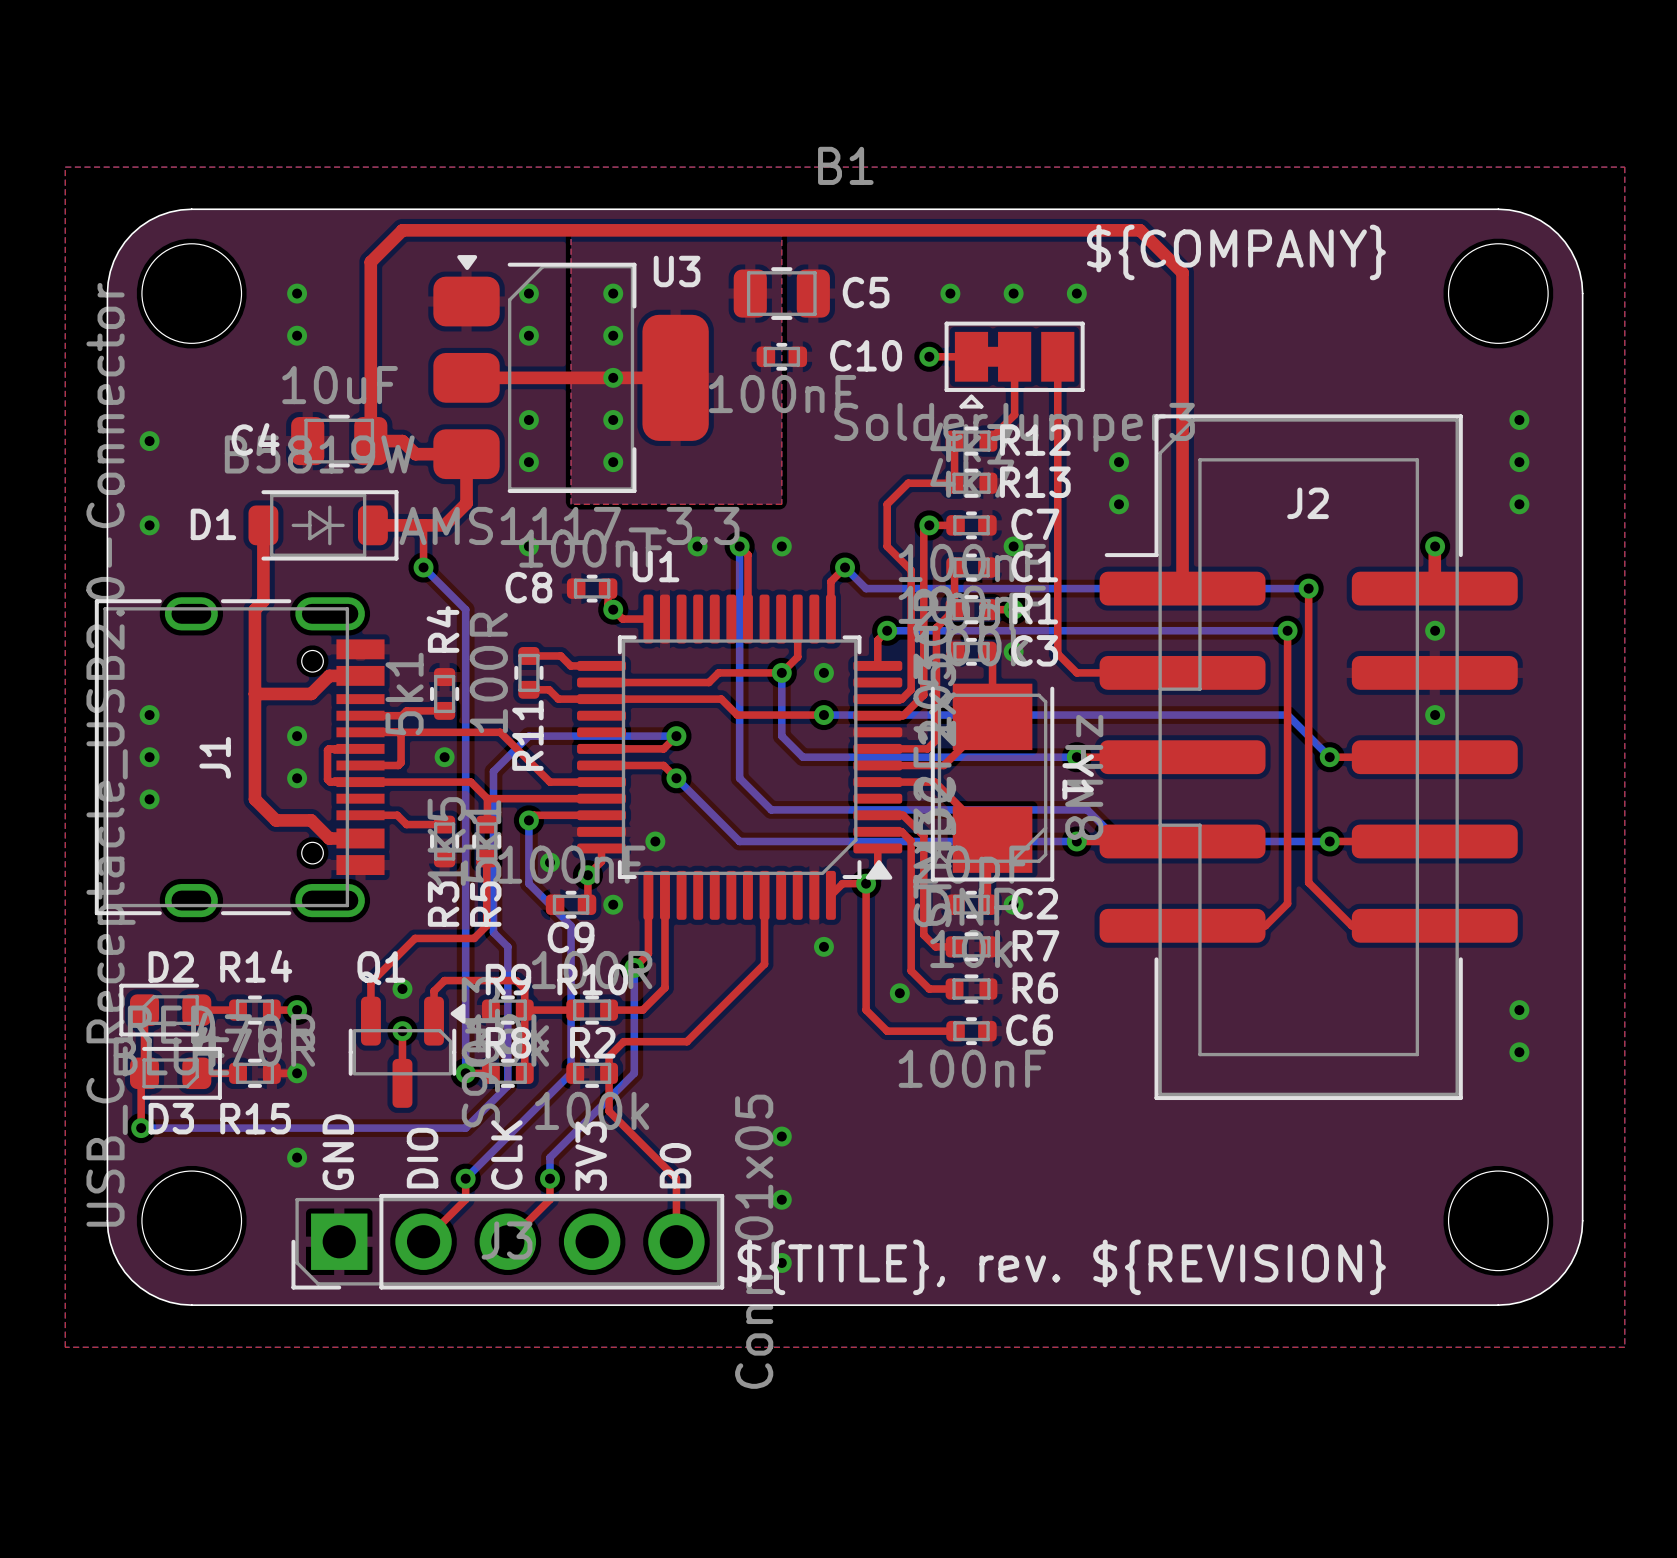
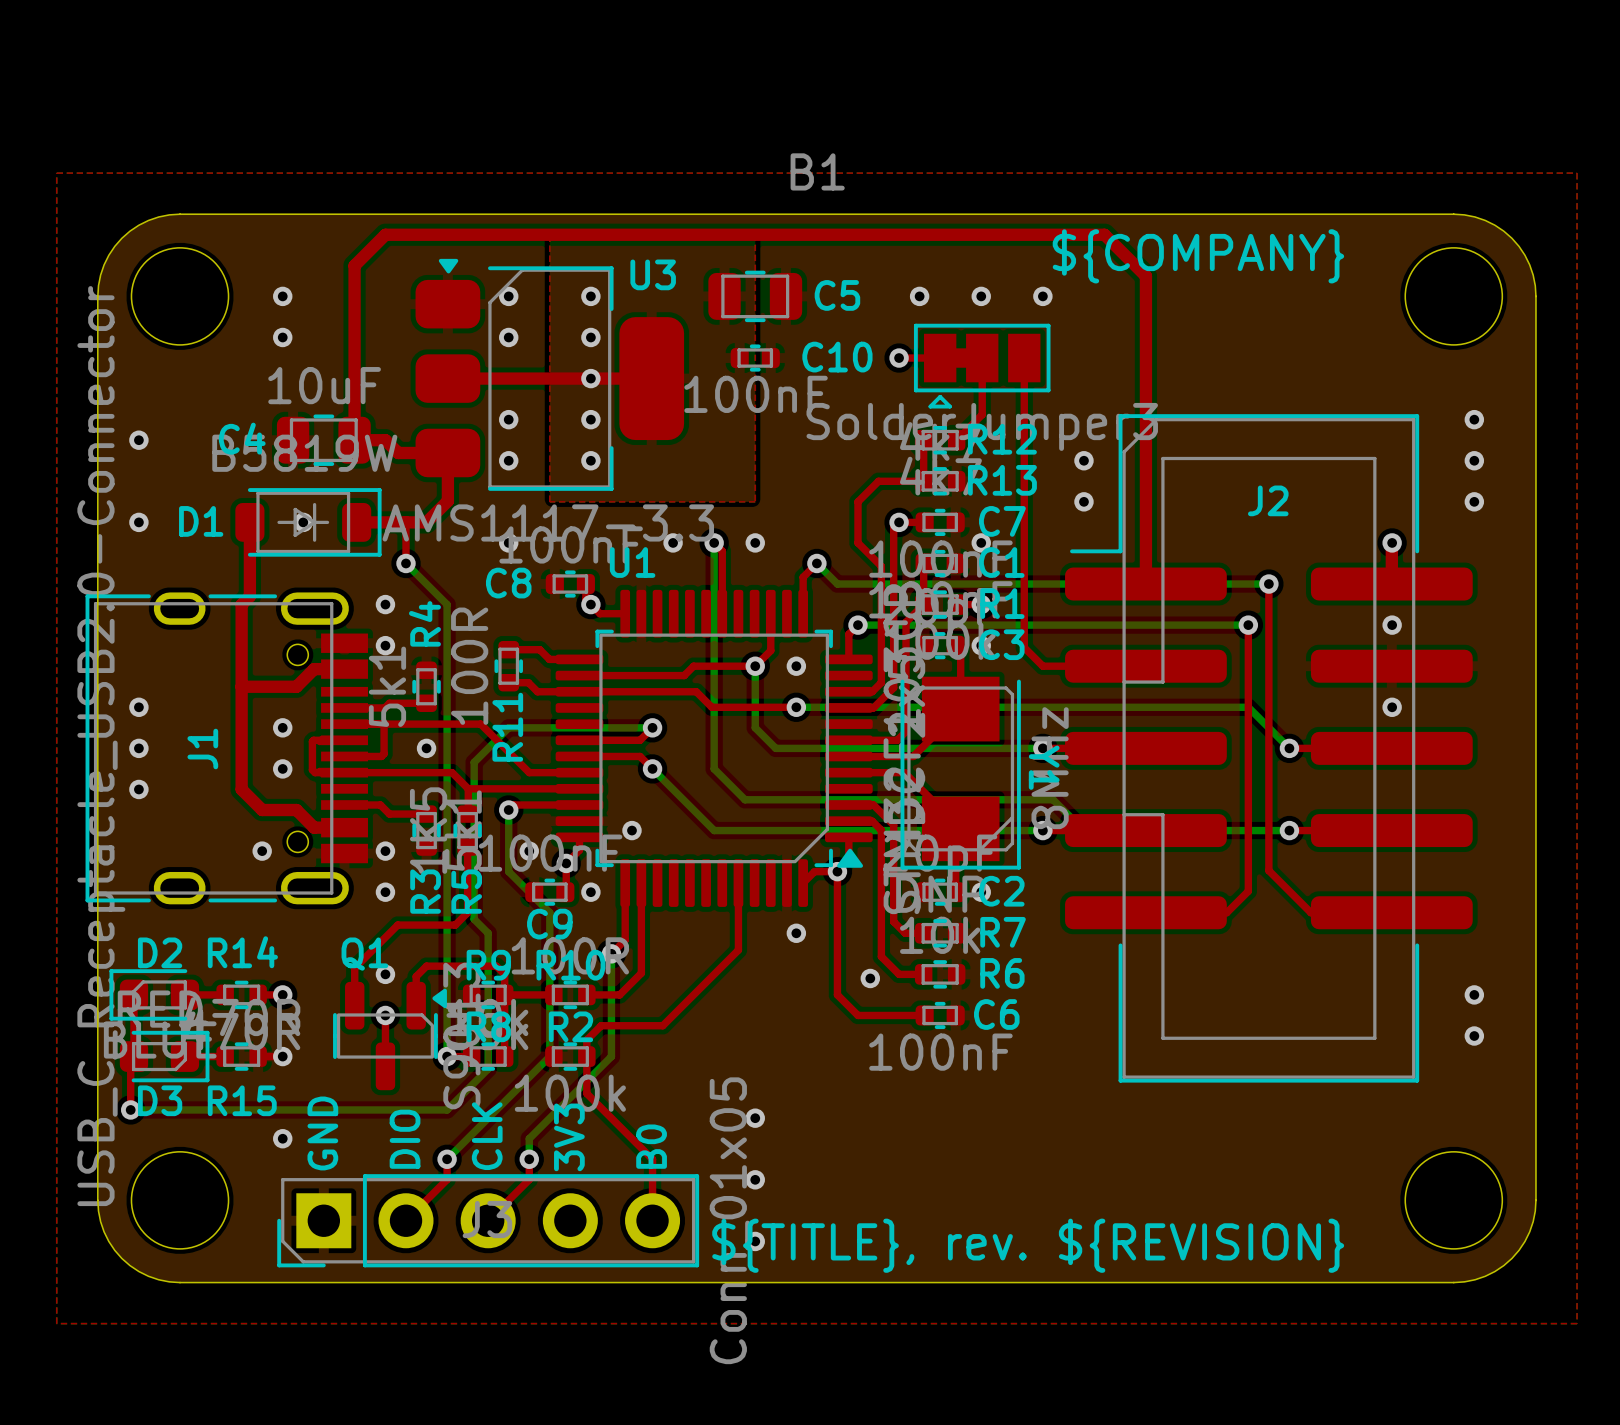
via: none -> (303, 522)
via: none -> (385, 604)
via: none -> (385, 645)
via: none -> (262, 851)
via: none -> (385, 851)
via: none -> (385, 892)

